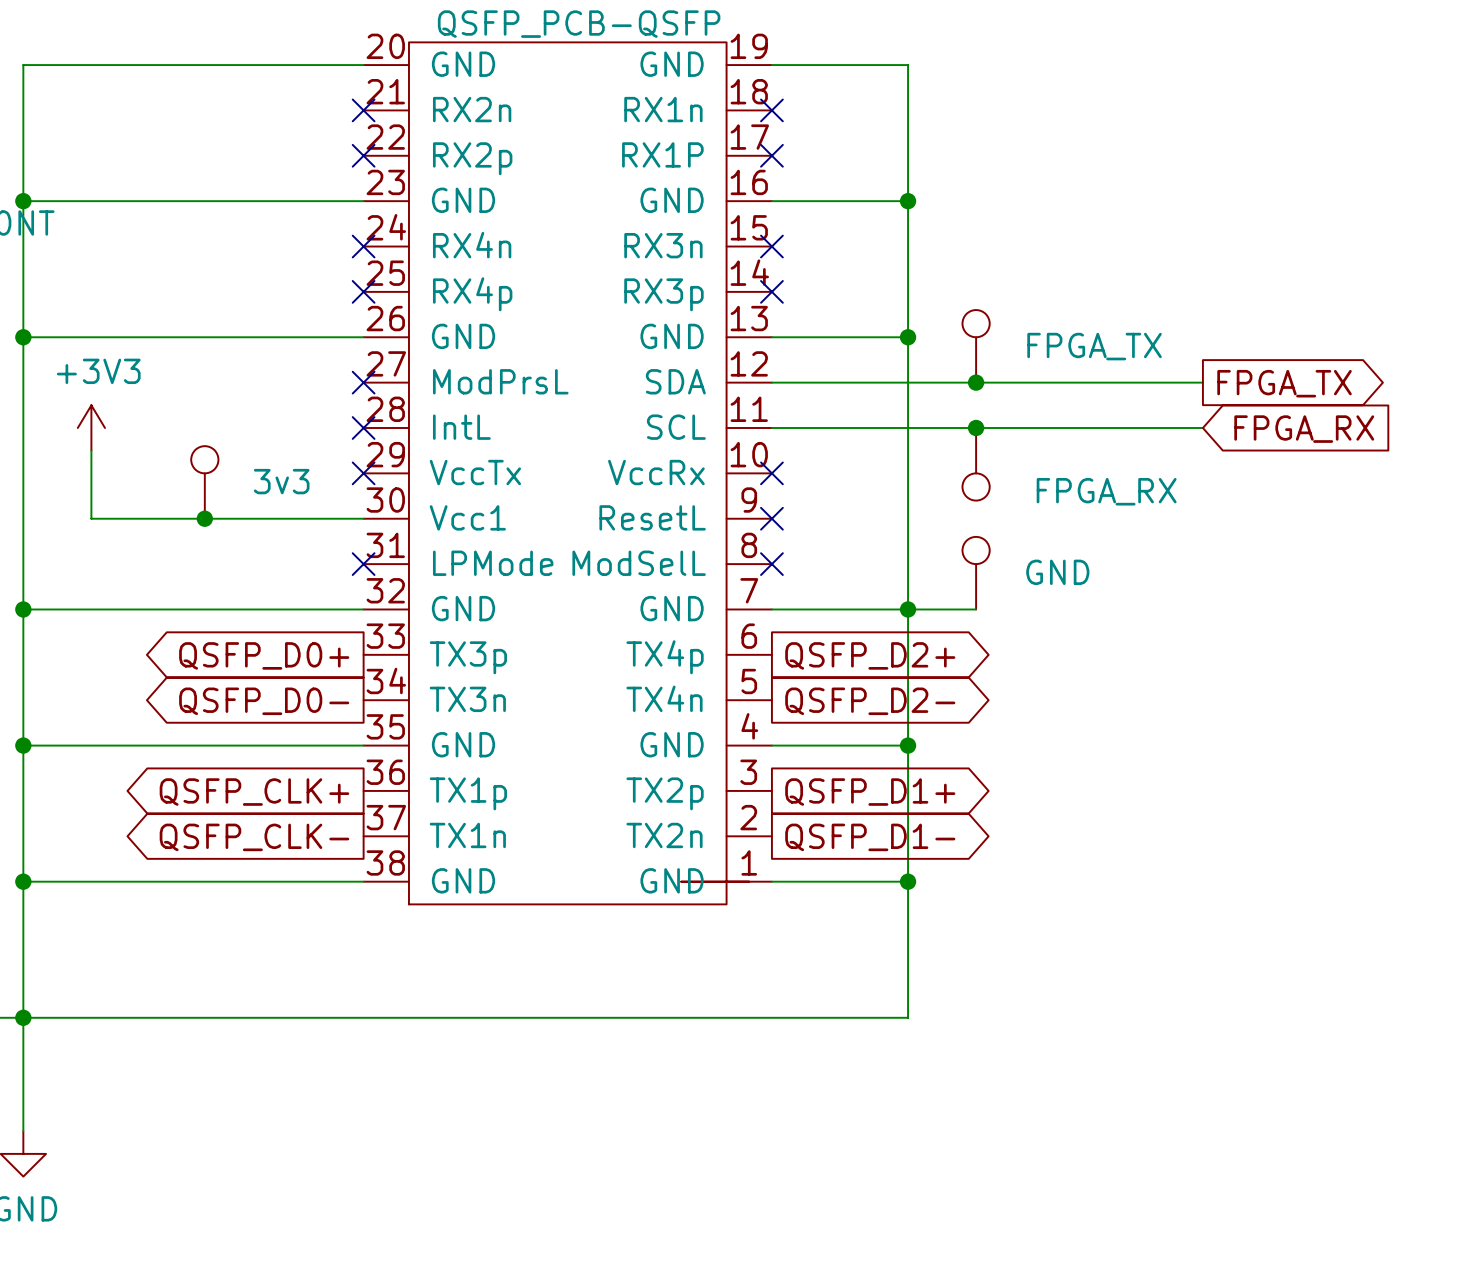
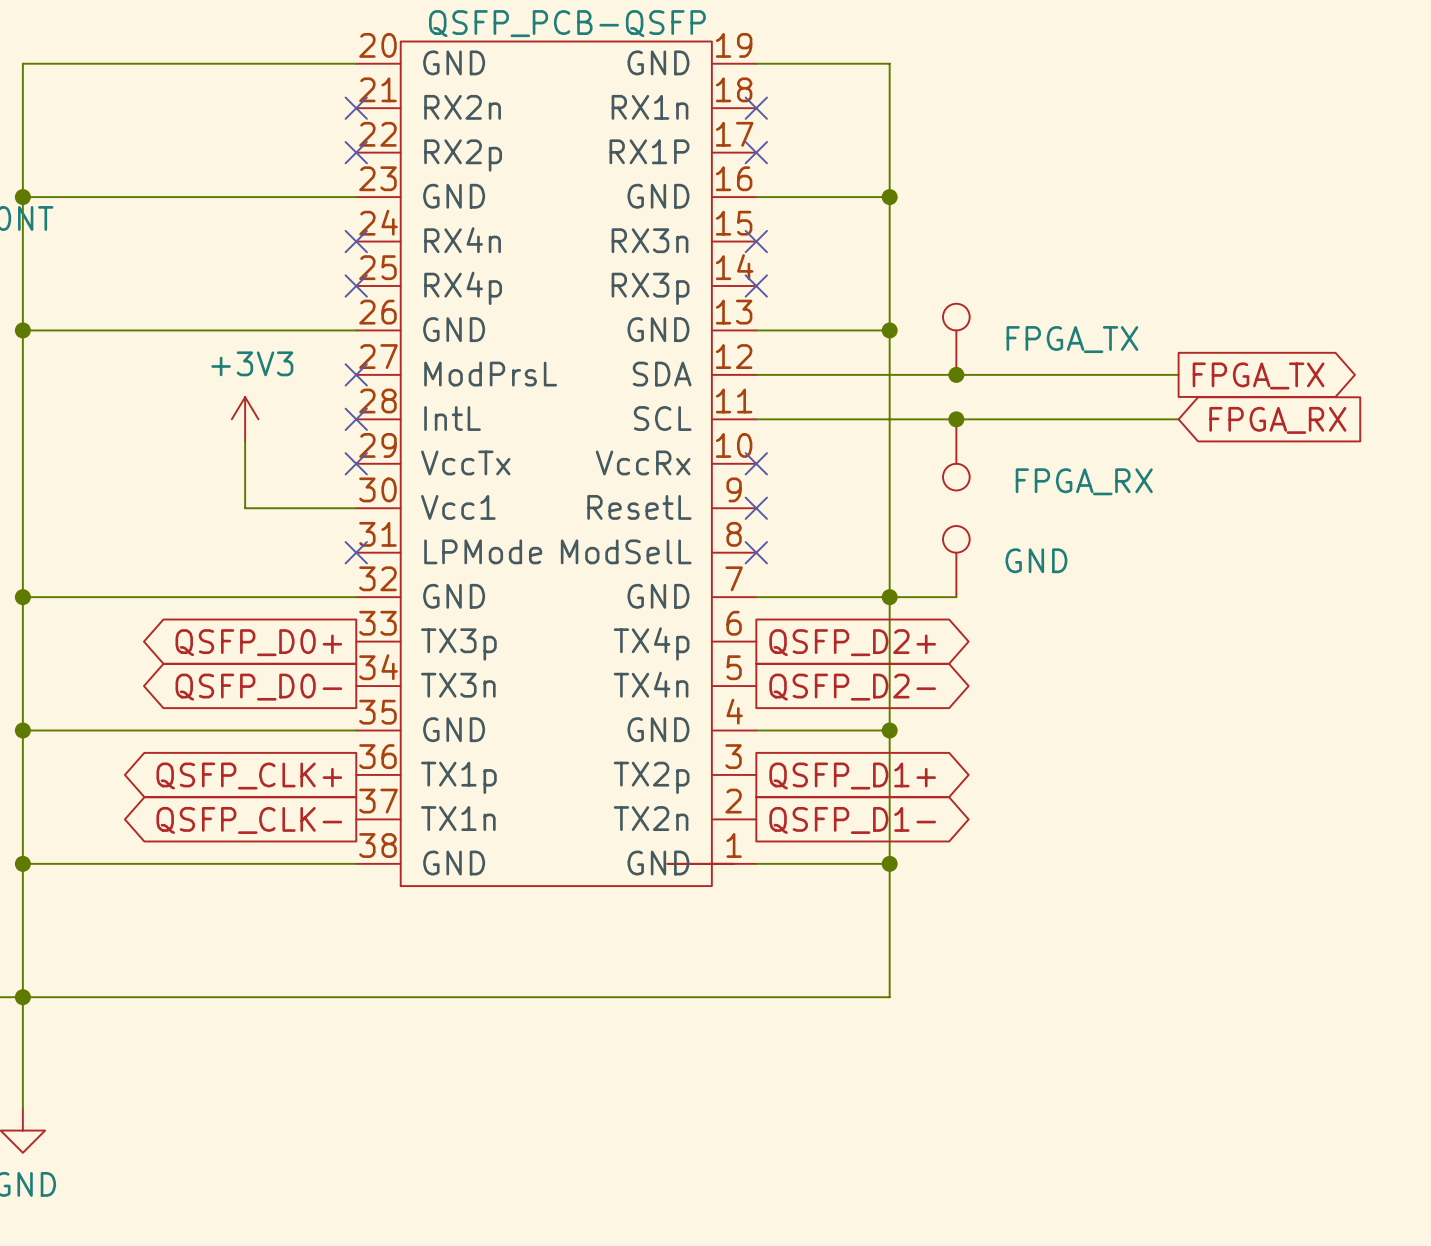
power symbol position: +3V3 (91, 428) -> +3V3 (245, 419)
wire: (91, 450) (91, 518) (250, 518) -> (245, 441) (245, 508)
part: 3v3 (204, 482) -> none
junction: (204, 518) -> none

